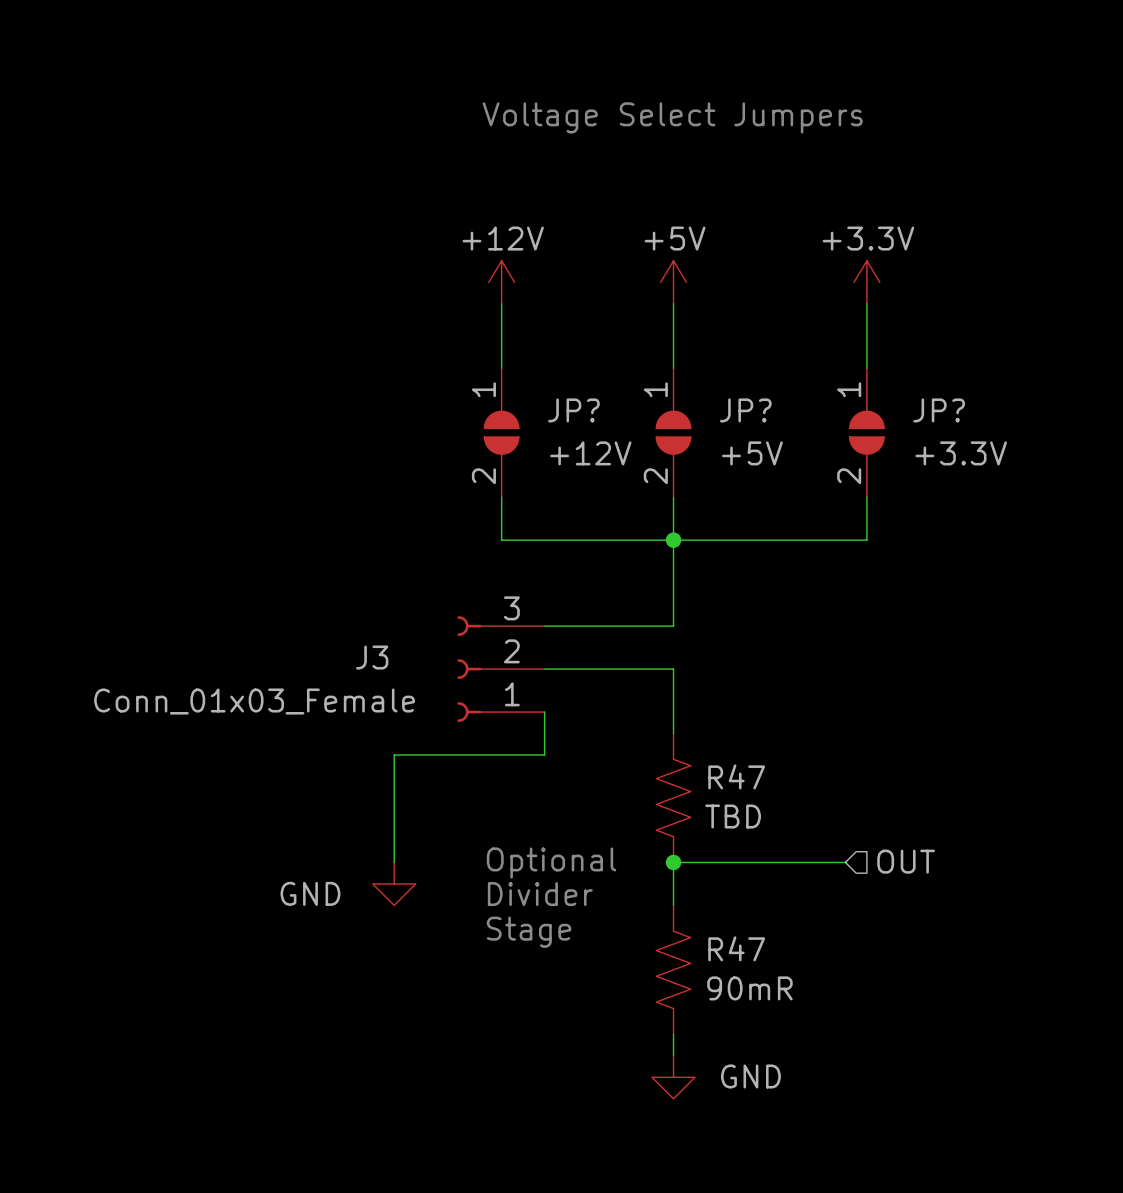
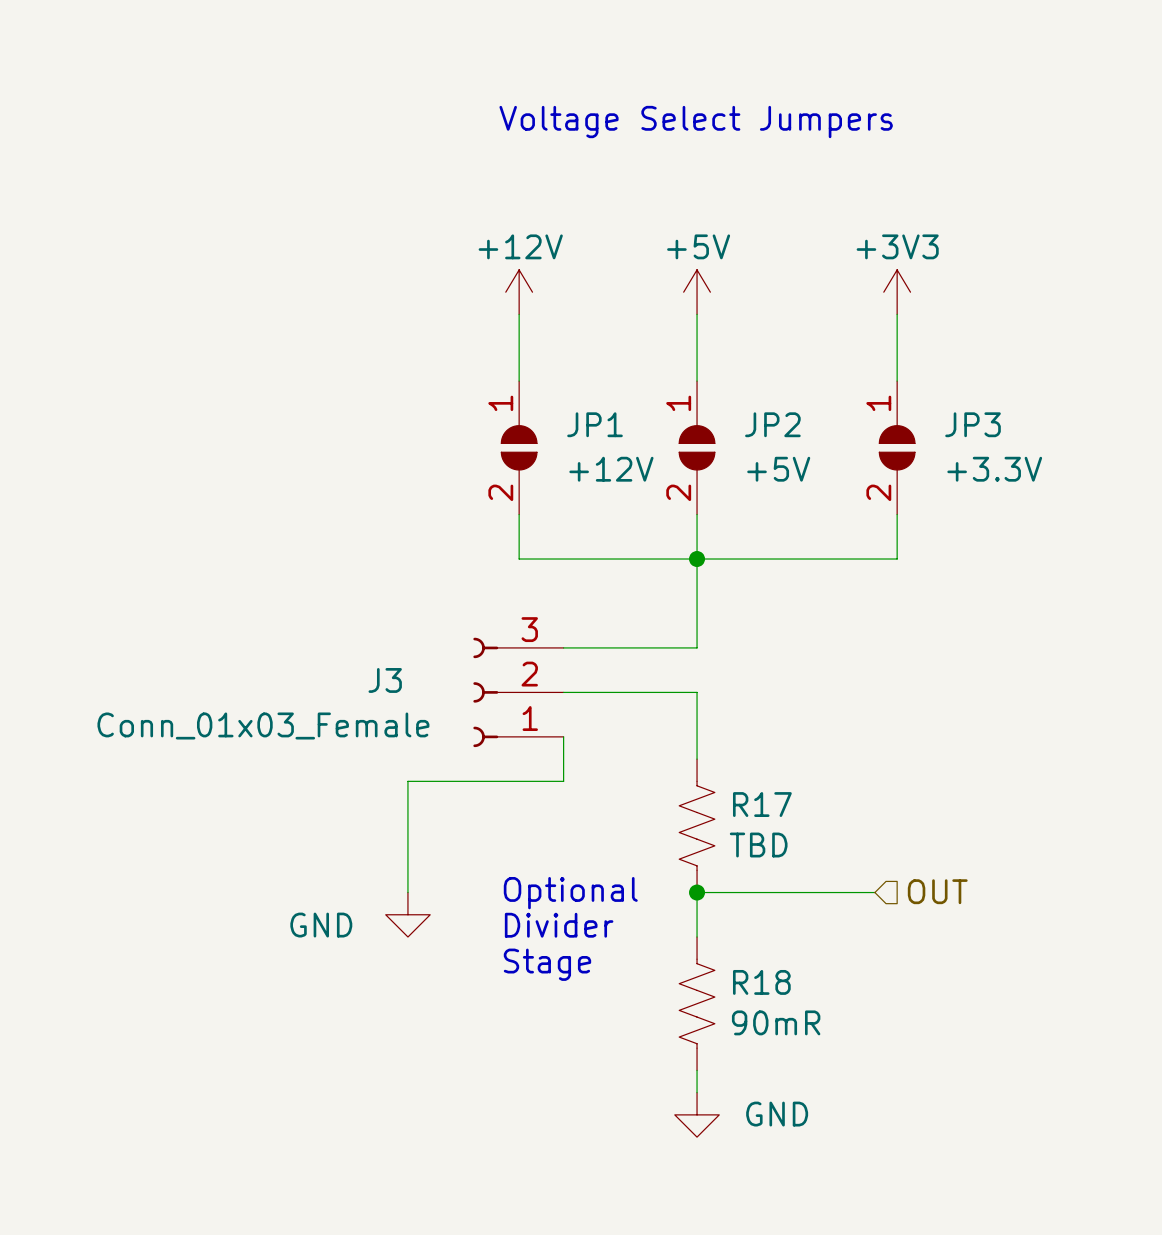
power symbol: +3.3V (866, 282) -> +3V3 (897, 292)
JP? name: JP? (573, 410) -> JP1 (595, 424)
JP? name: JP? (745, 410) -> JP2 (772, 424)
JP? name: JP? (939, 410) -> JP3 (973, 424)
R47 name: R47 (736, 776) -> R17 (762, 804)
R47 name: R47 (736, 948) -> R18 (761, 982)

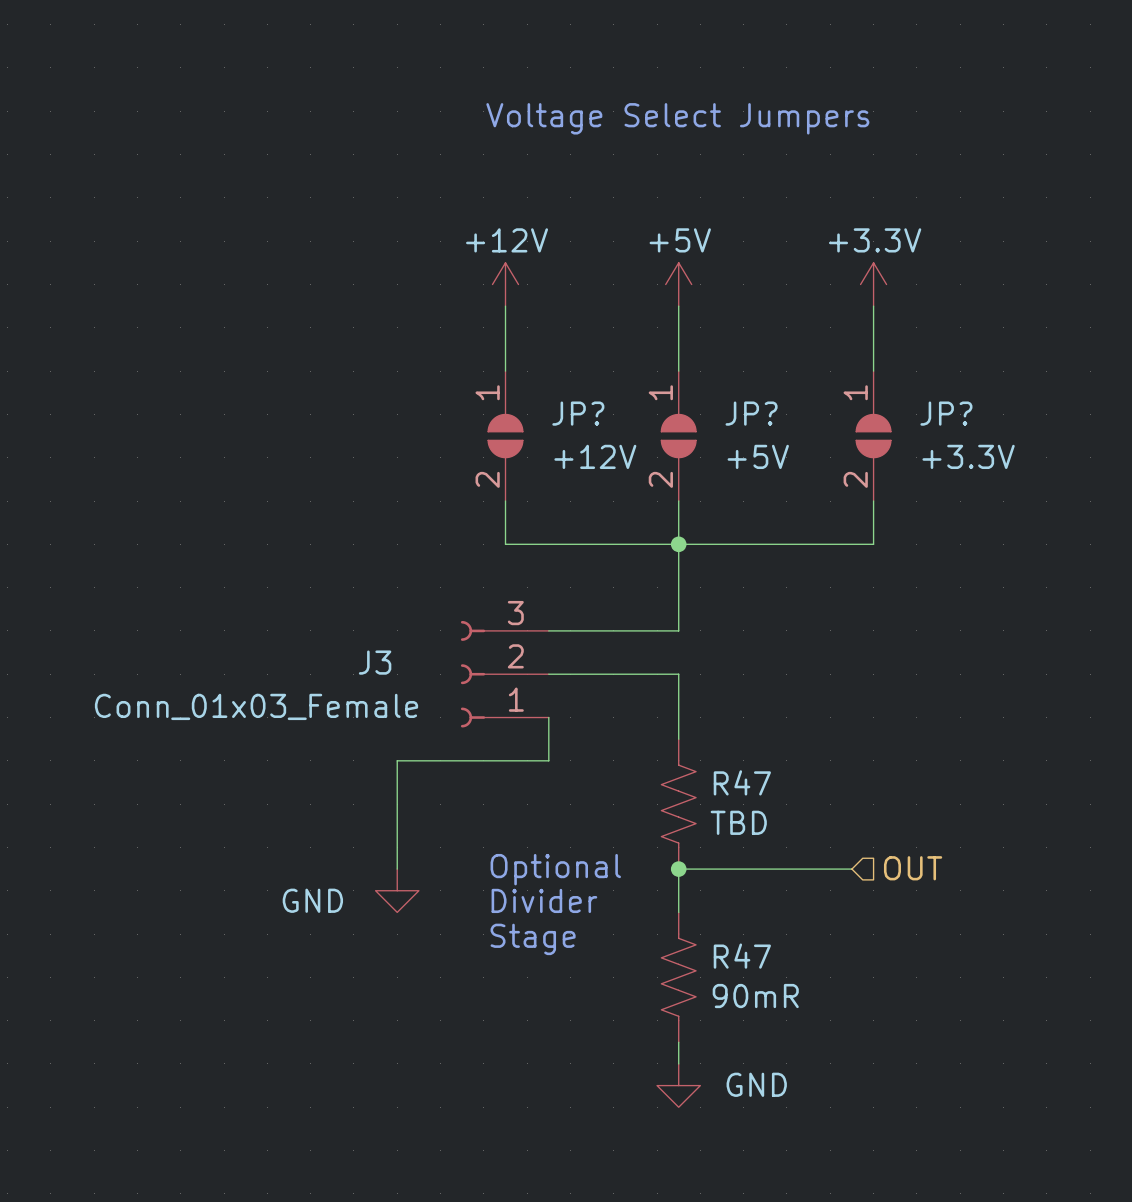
power symbol: +3V3 (897, 292) -> +3.3V (873, 284)
JP1 name: JP1 (595, 424) -> JP? (578, 413)
JP2 name: JP2 (772, 424) -> JP? (751, 413)
JP3 name: JP3 (973, 424) -> JP? (946, 413)
R17 name: R17 (762, 804) -> R47 (742, 782)
R18 name: R18 (761, 982) -> R47 (742, 956)

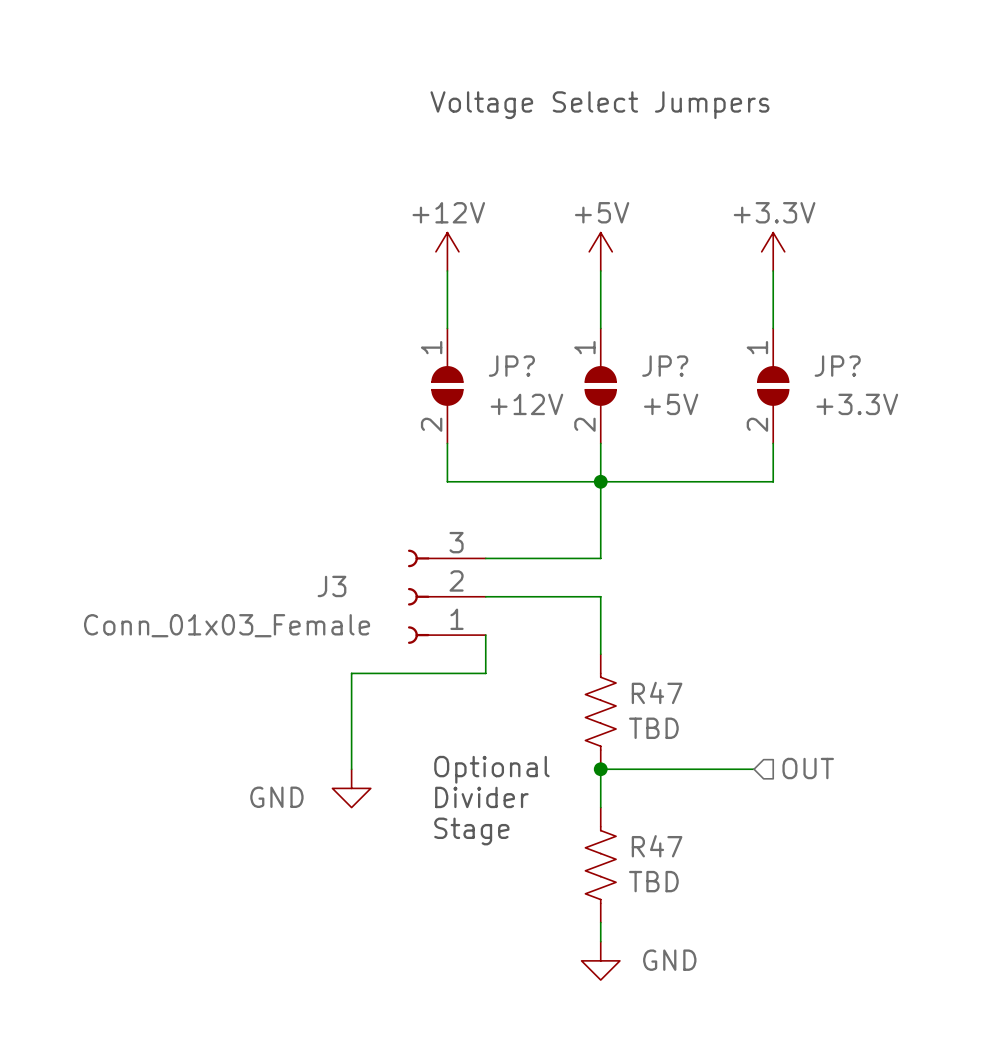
R47 value: 90mR (755, 996) -> TBD (653, 881)

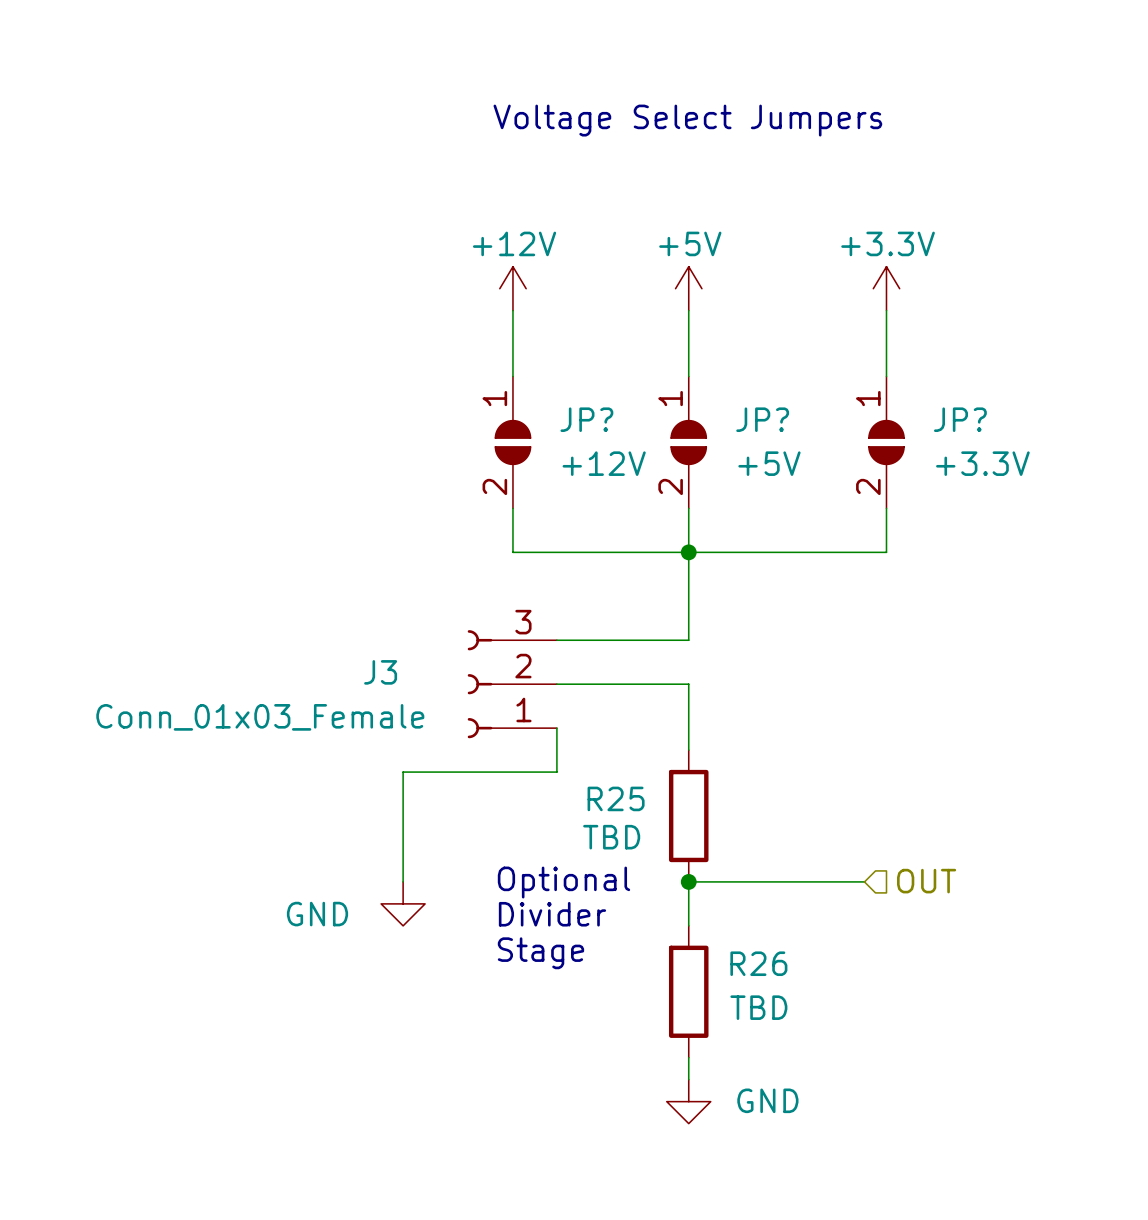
R47: TBD (600, 711) -> none
R25: none -> TBD (688, 816)
R47: TBD (600, 865) -> none
R26: none -> TBD (688, 991)

